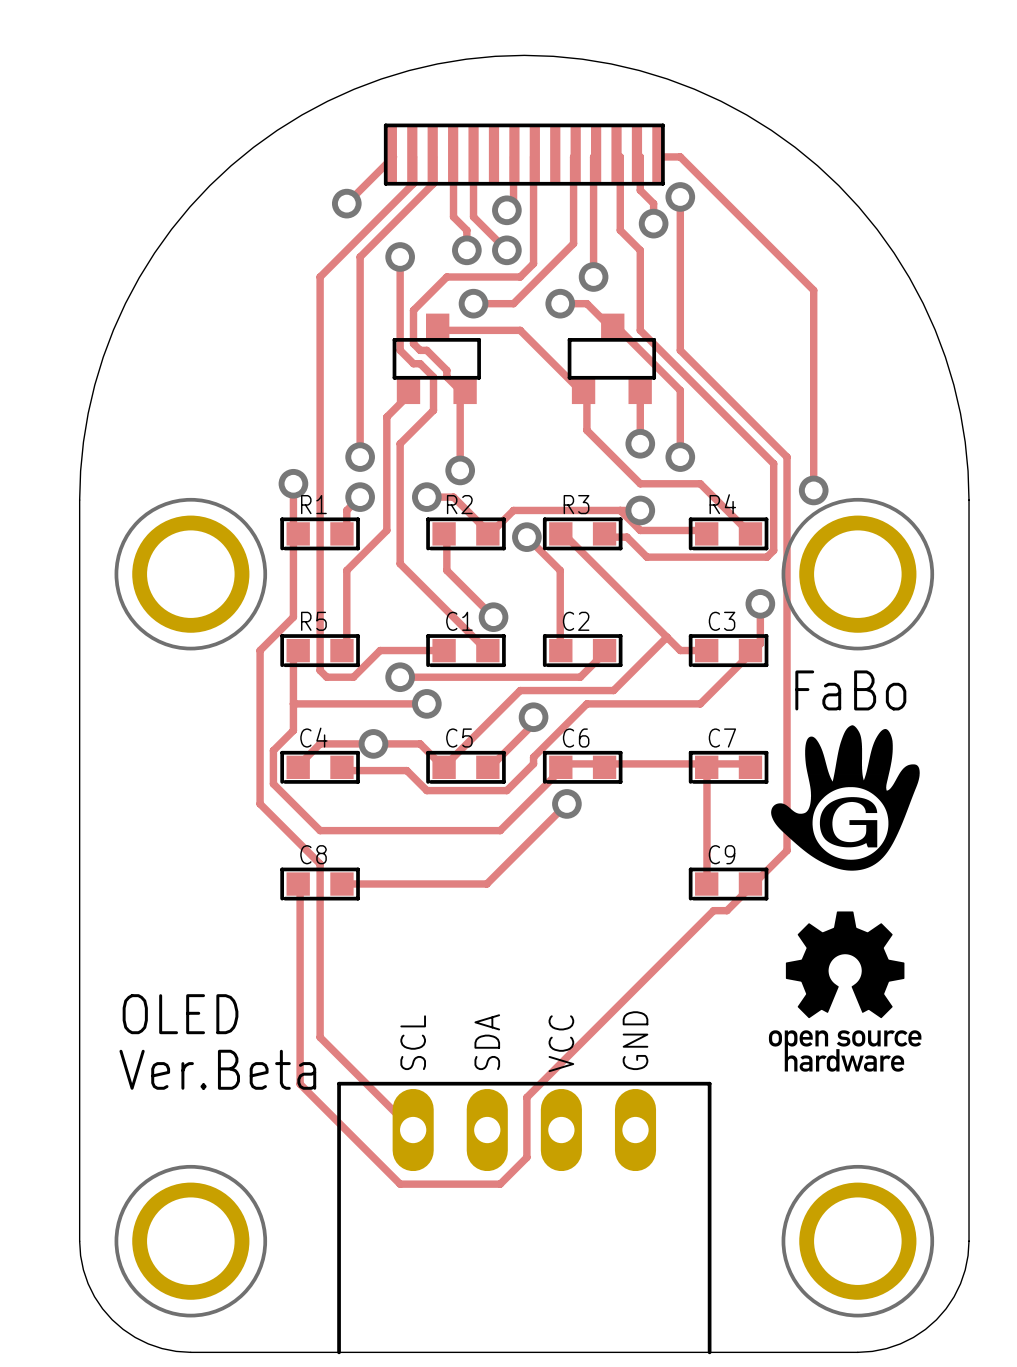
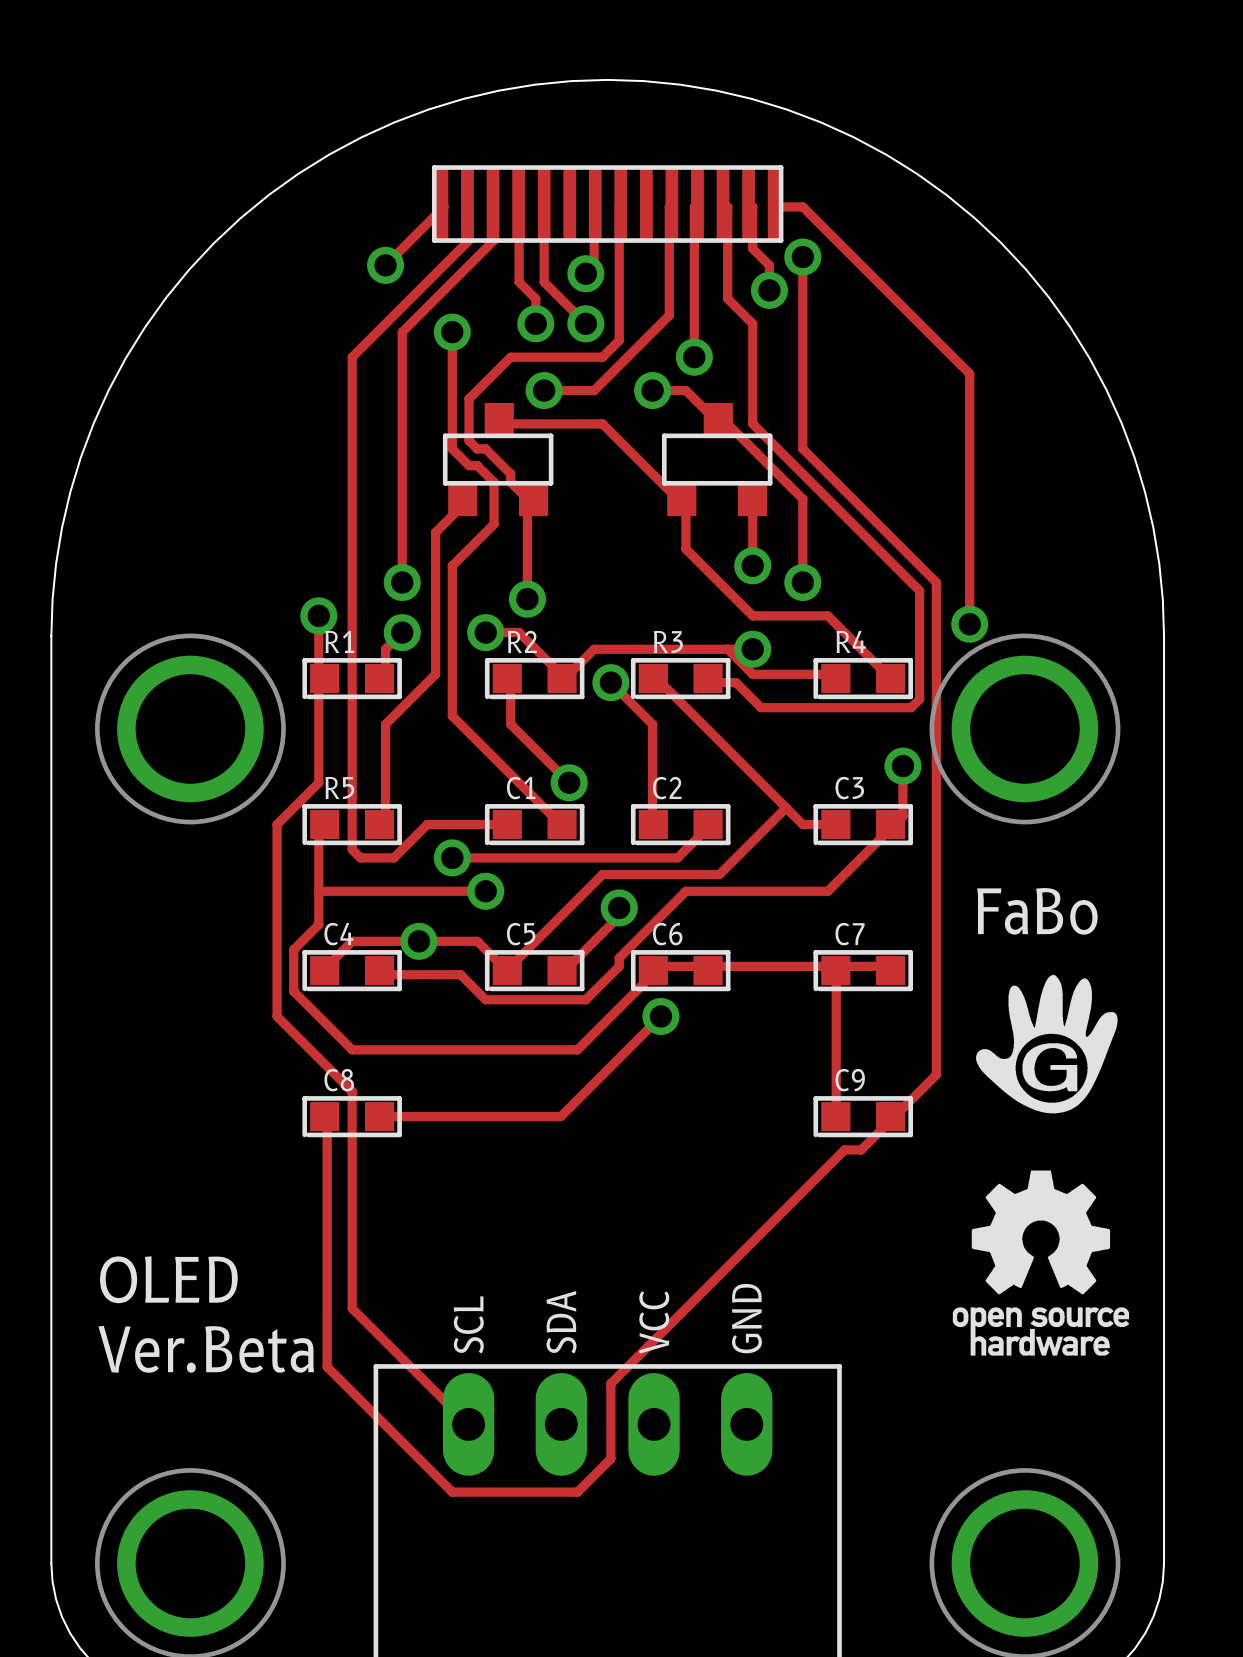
text position: FaBo (850, 690) -> FaBo (1037, 911)
drawing: [771, 725, 920, 871] -> none
drawing: none -> [976, 974, 1118, 1114]
drawing shape: [768, 911, 922, 1072] -> [952, 1170, 1130, 1356]

